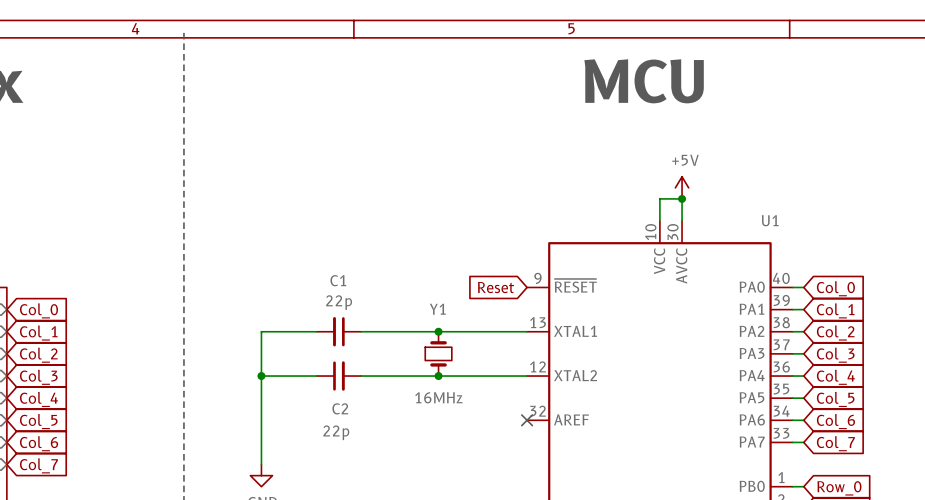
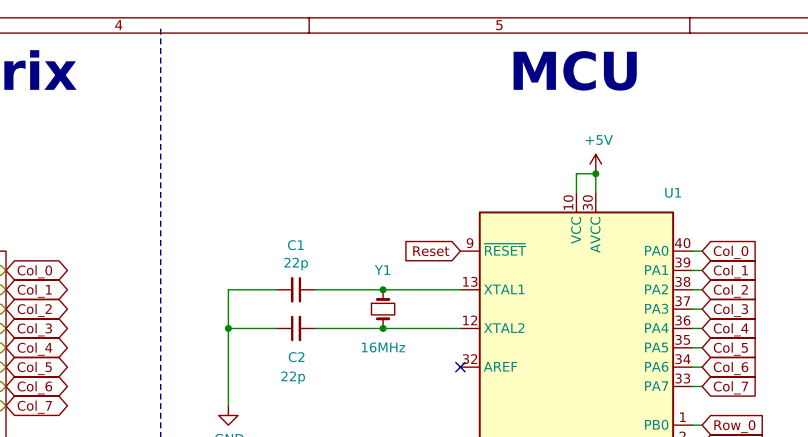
global label shape: input (38, 310) -> bidirectional (34, 271)
global label shape: input (38, 333) -> bidirectional (34, 291)
global label shape: input (38, 355) -> bidirectional (34, 310)
global label shape: input (38, 377) -> bidirectional (34, 329)
global label shape: input (38, 399) -> bidirectional (34, 349)
global label shape: input (38, 421) -> bidirectional (34, 368)
global label shape: input (39, 443) -> bidirectional (34, 387)
global label shape: input (38, 465) -> bidirectional (34, 407)

